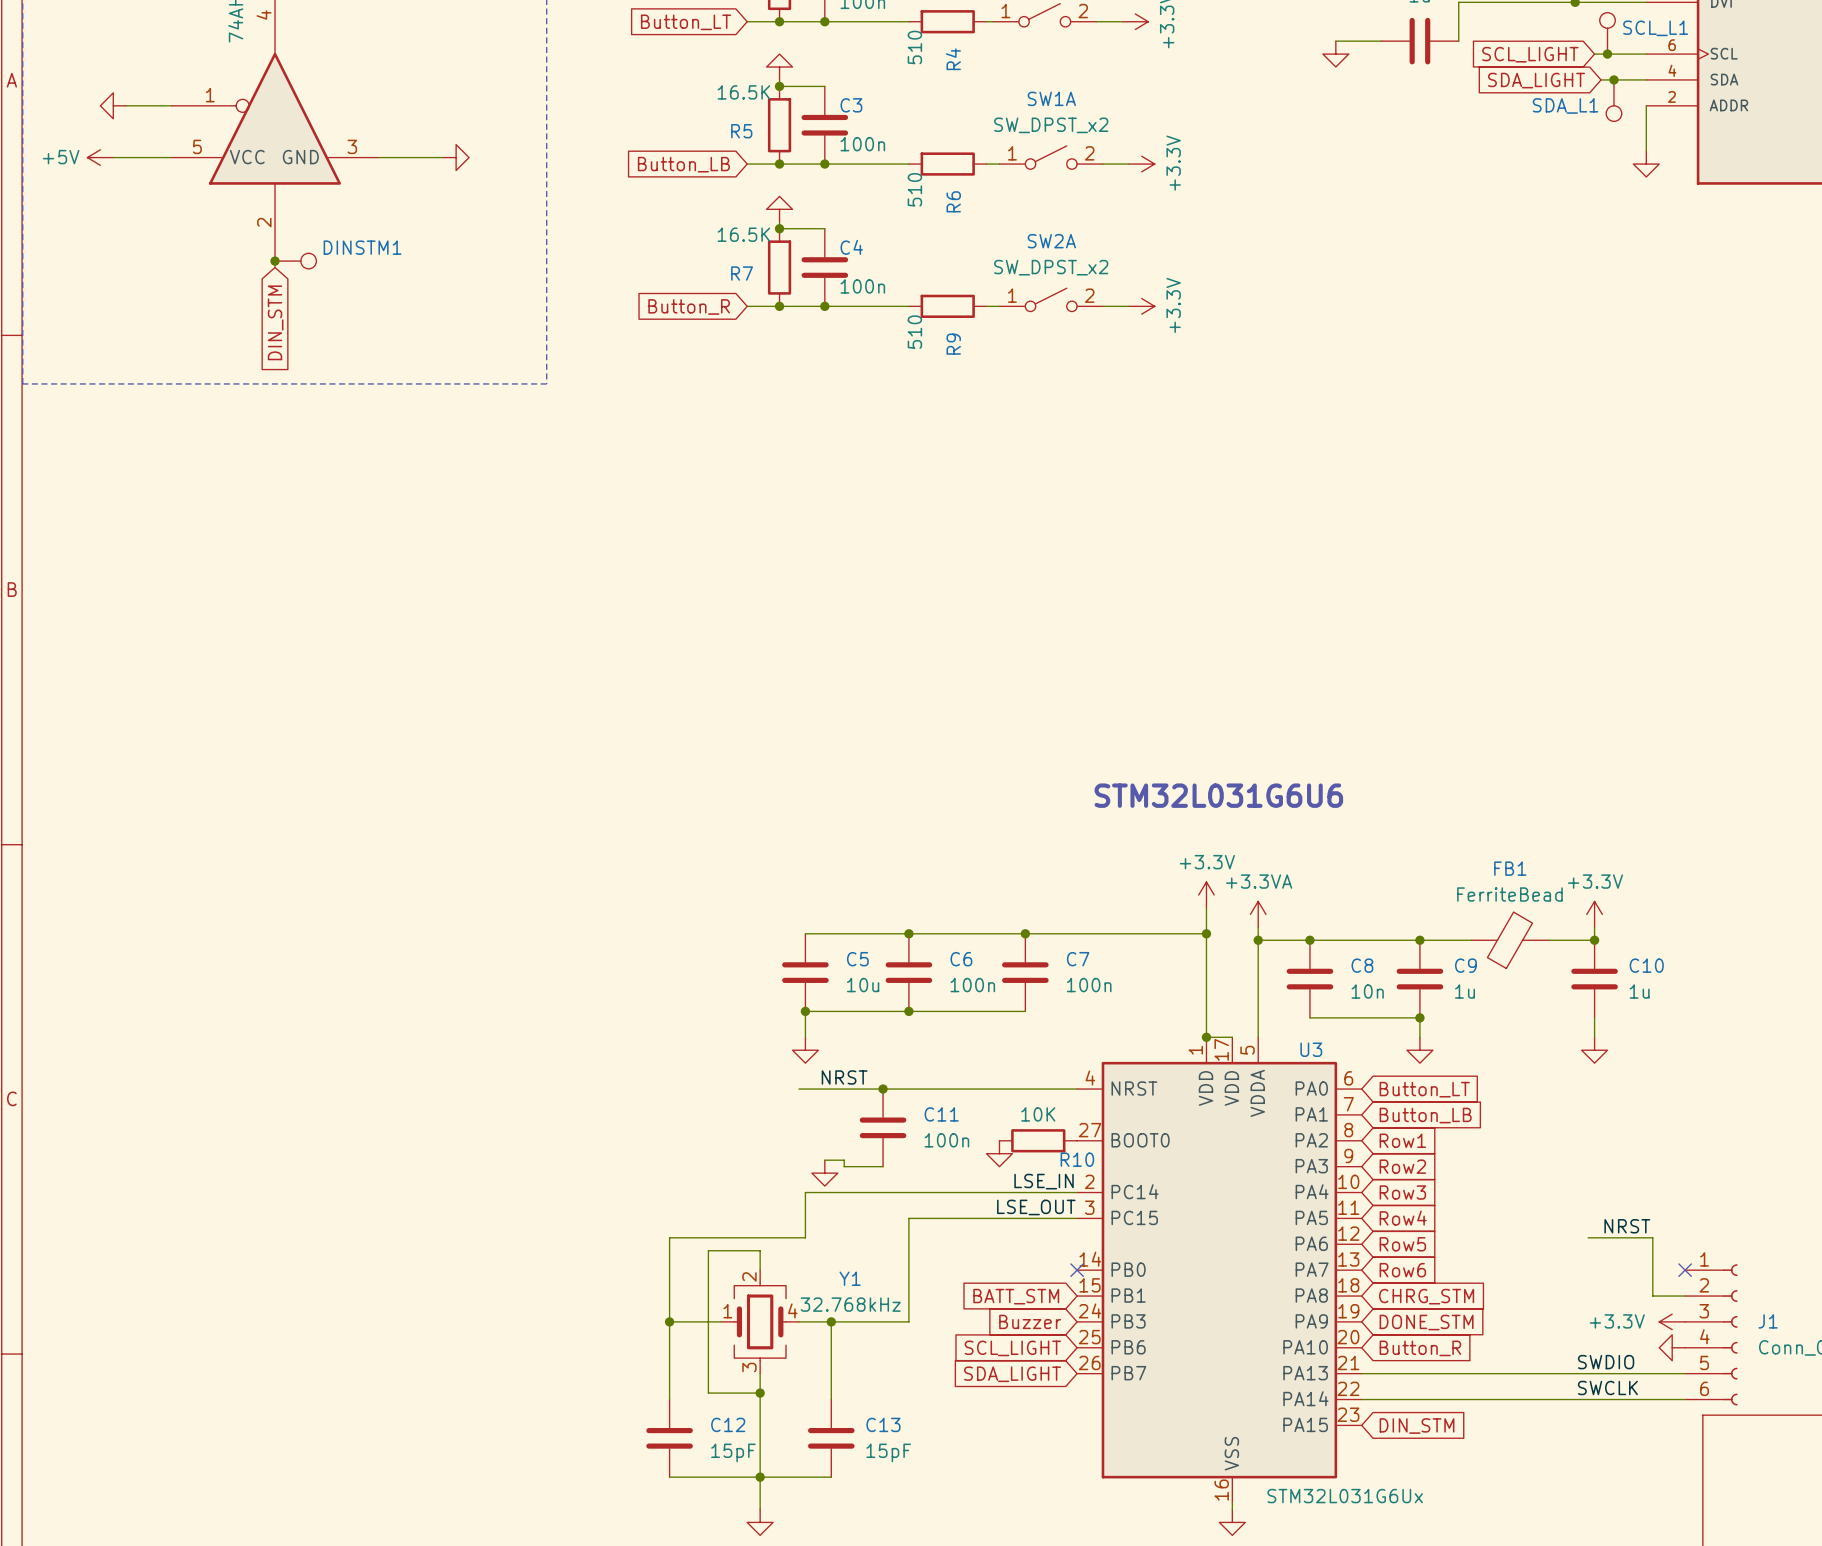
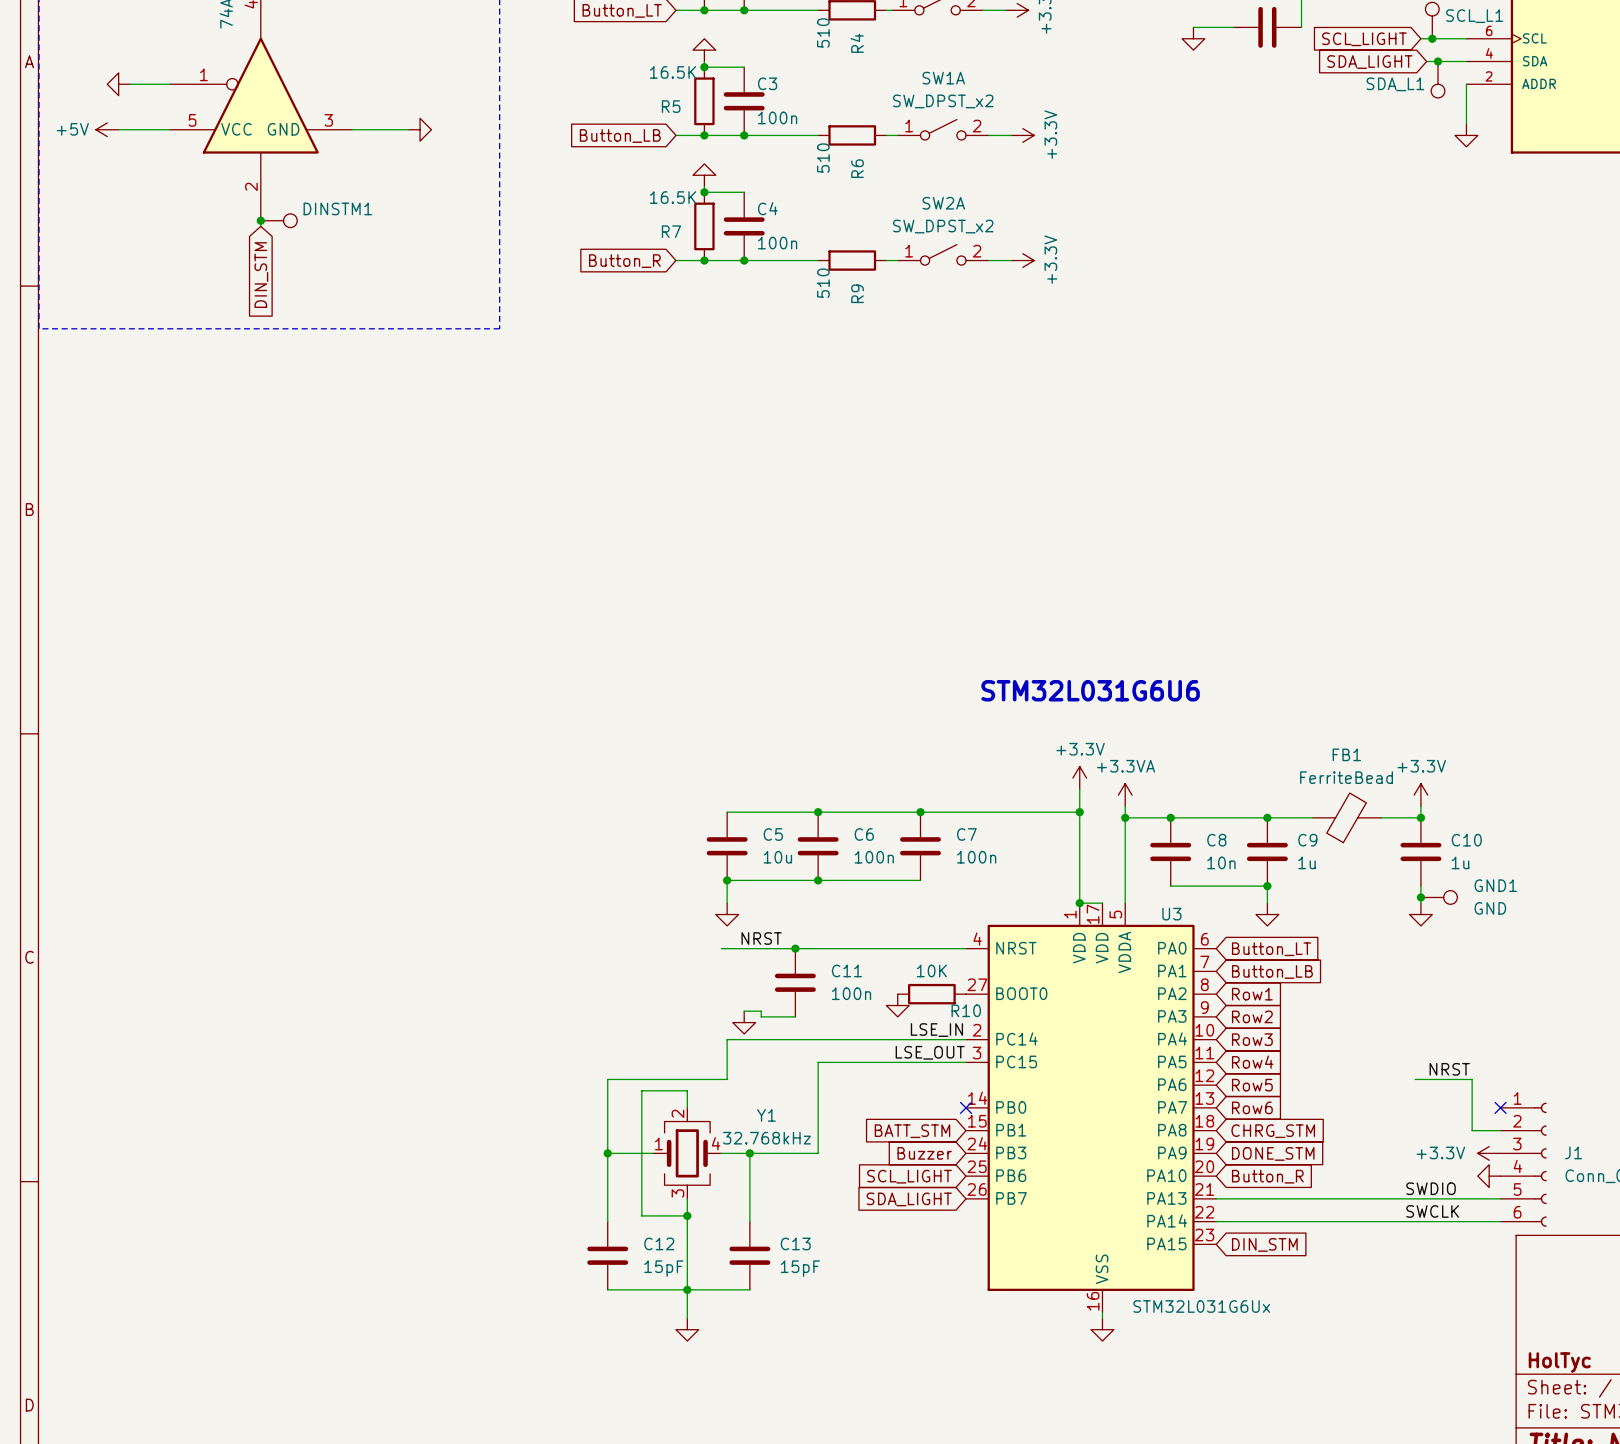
junction: none -> (1420, 897)
GND1: none -> GND (1439, 897)

